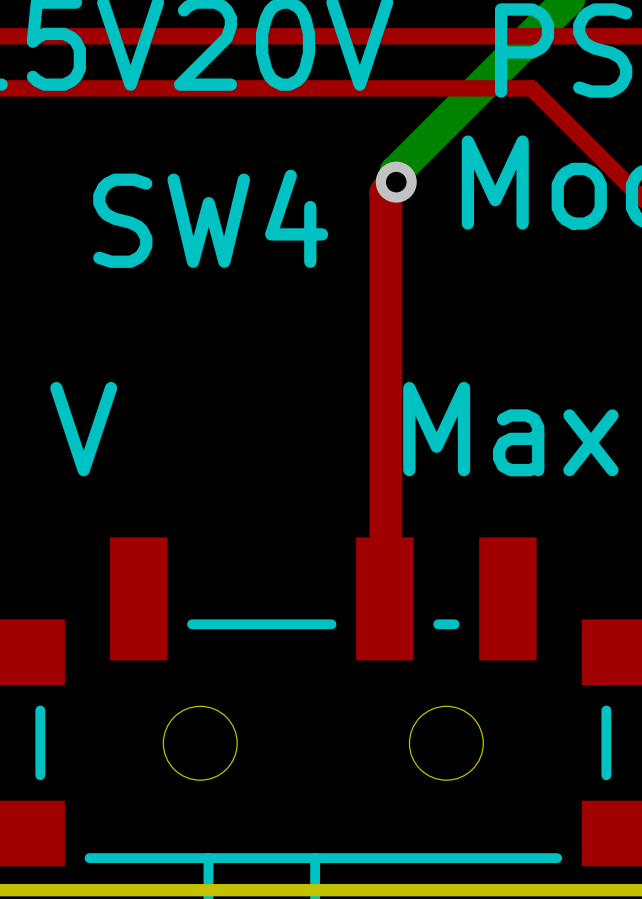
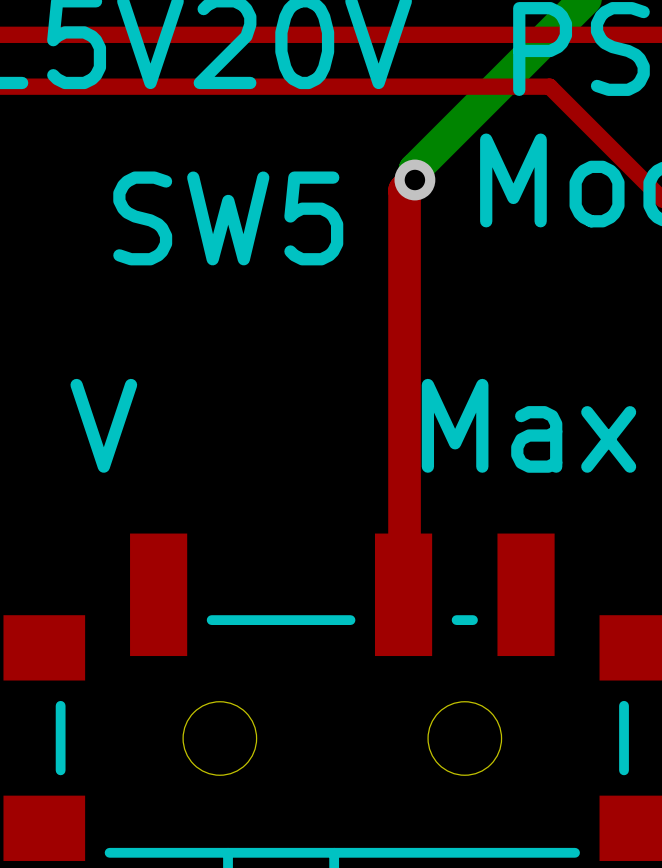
SW4 name: SW4 (210, 218) -> SW5 (228, 218)

